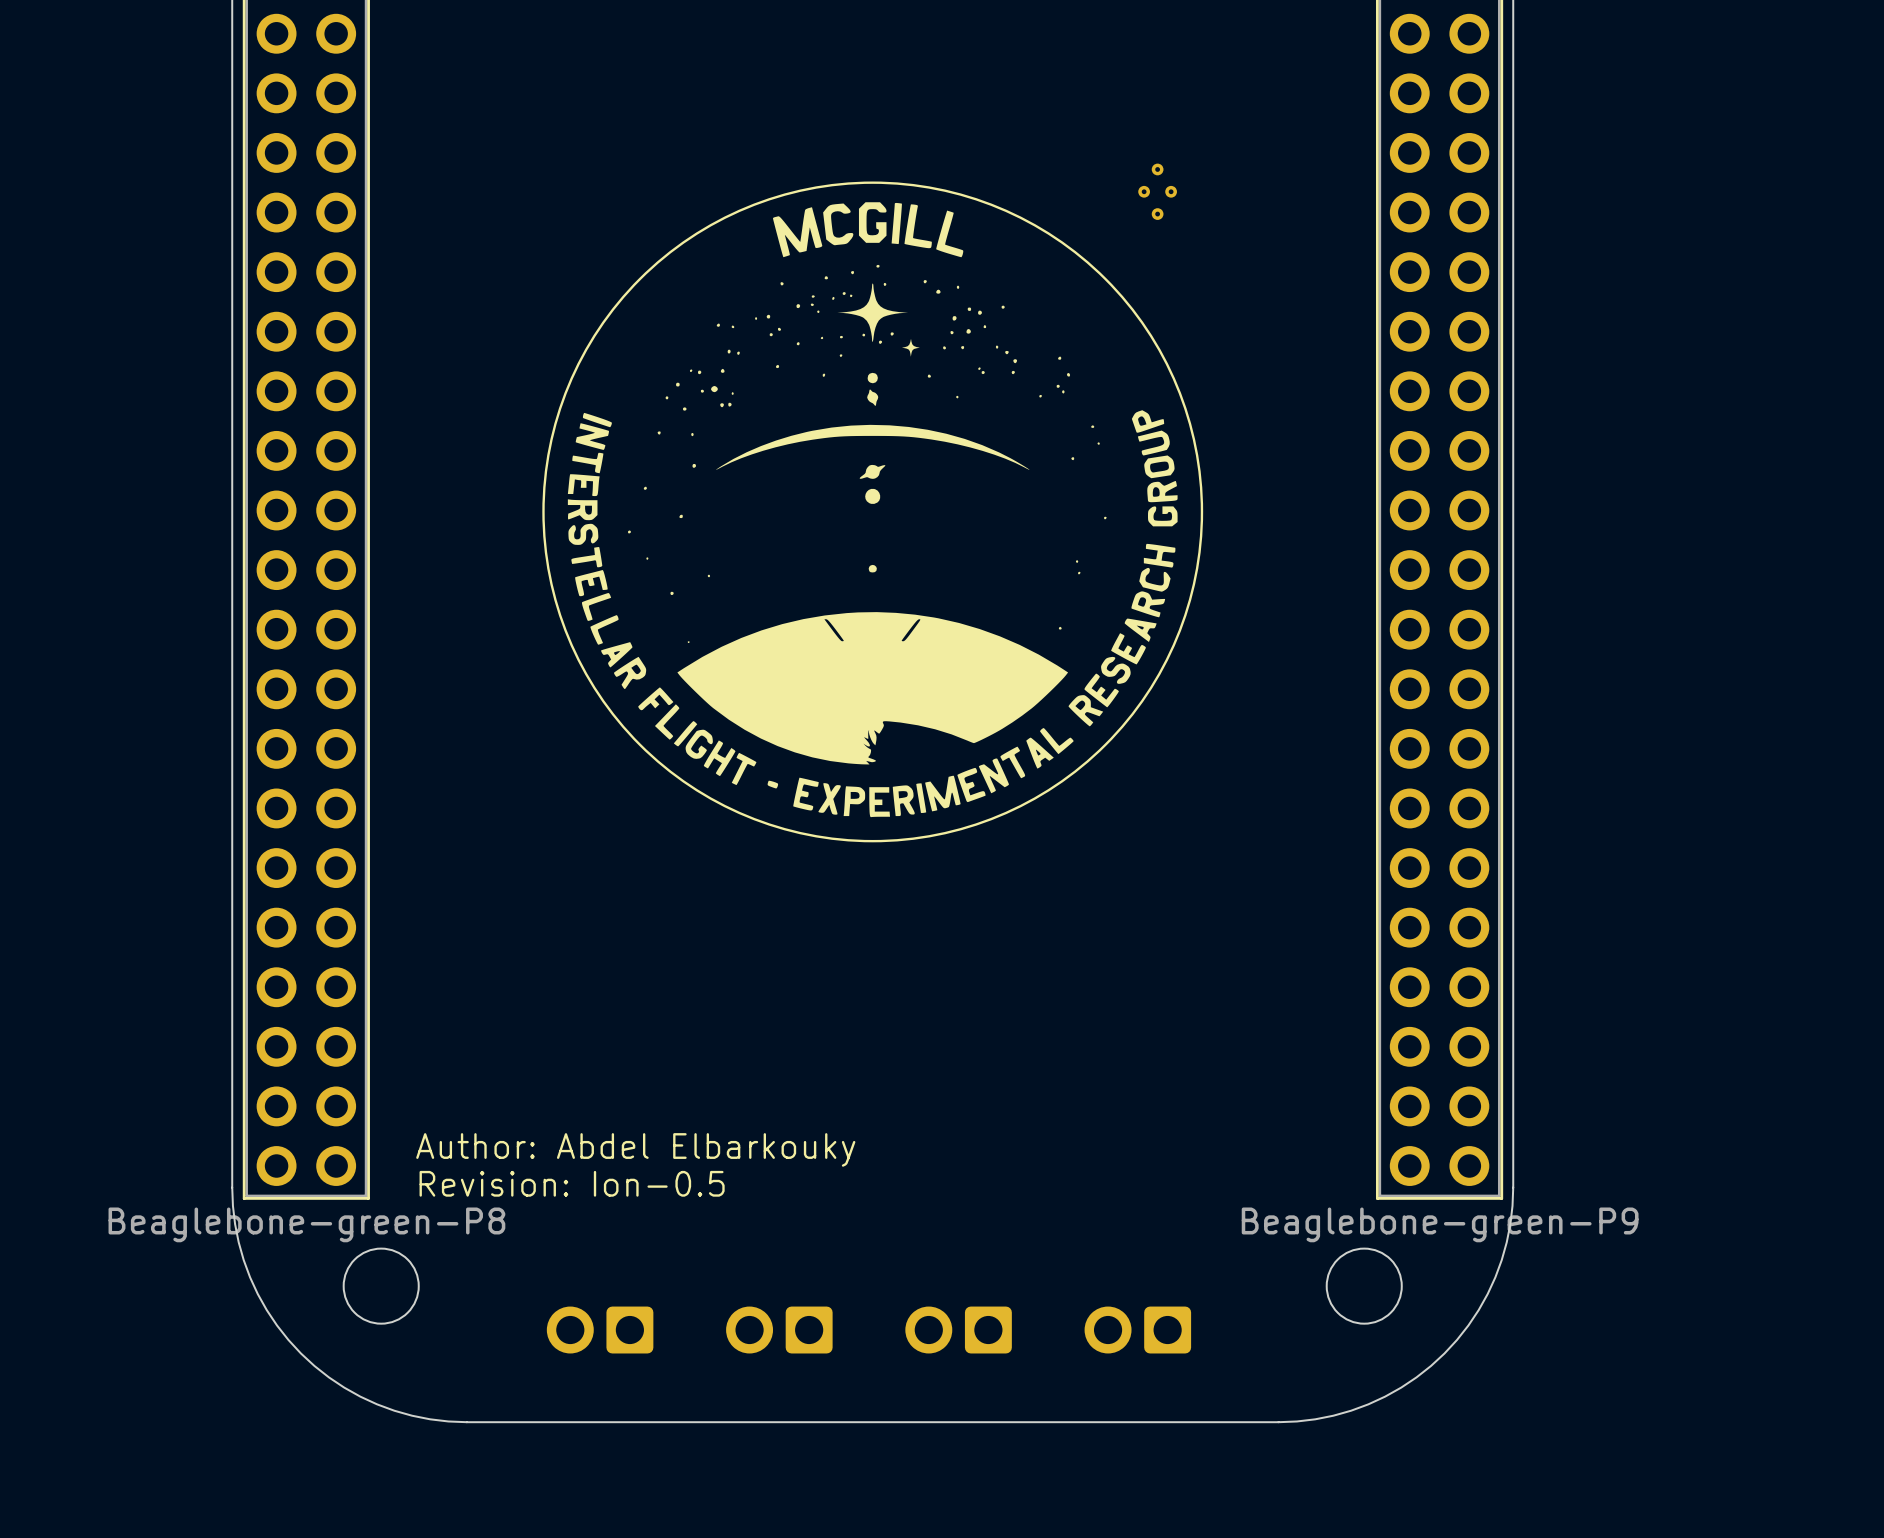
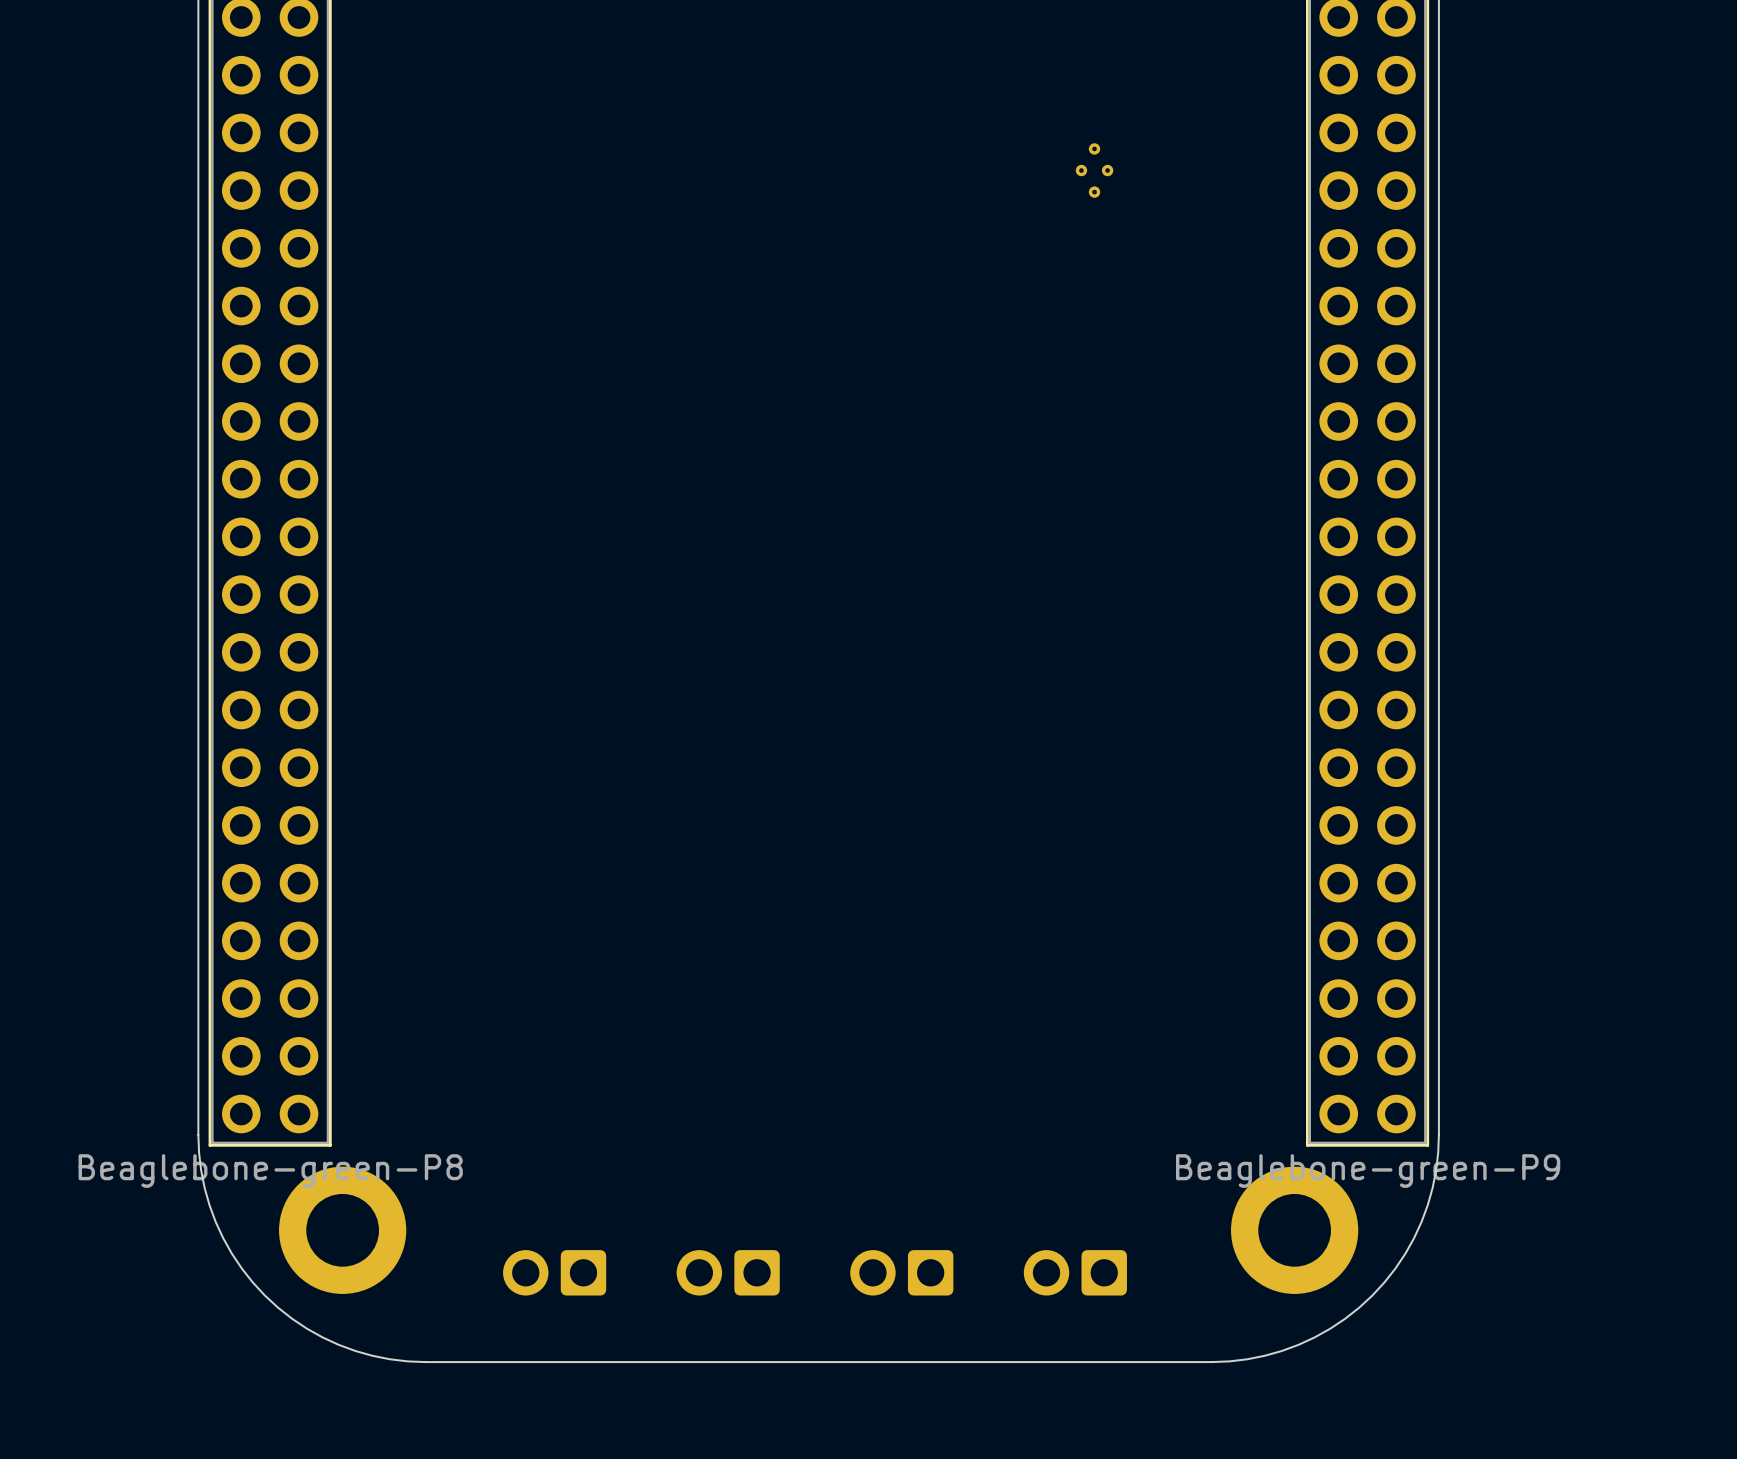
drawing: [542, 181, 1204, 843] -> none
text: Author: Abdel Elbarkouky (635, 1149) -> none
text: Revision: Ion-0.5 (572, 1183) -> none
round board edge: [343, 1248, 420, 1325] -> none
round board edge: [1326, 1248, 1403, 1325] -> none
part: none -> (342, 1230)
part: none -> (1294, 1230)

